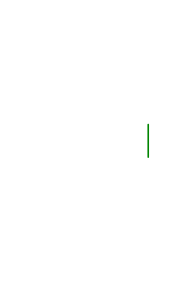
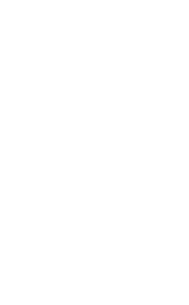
wire: (148, 124) (148, 157) -> none

